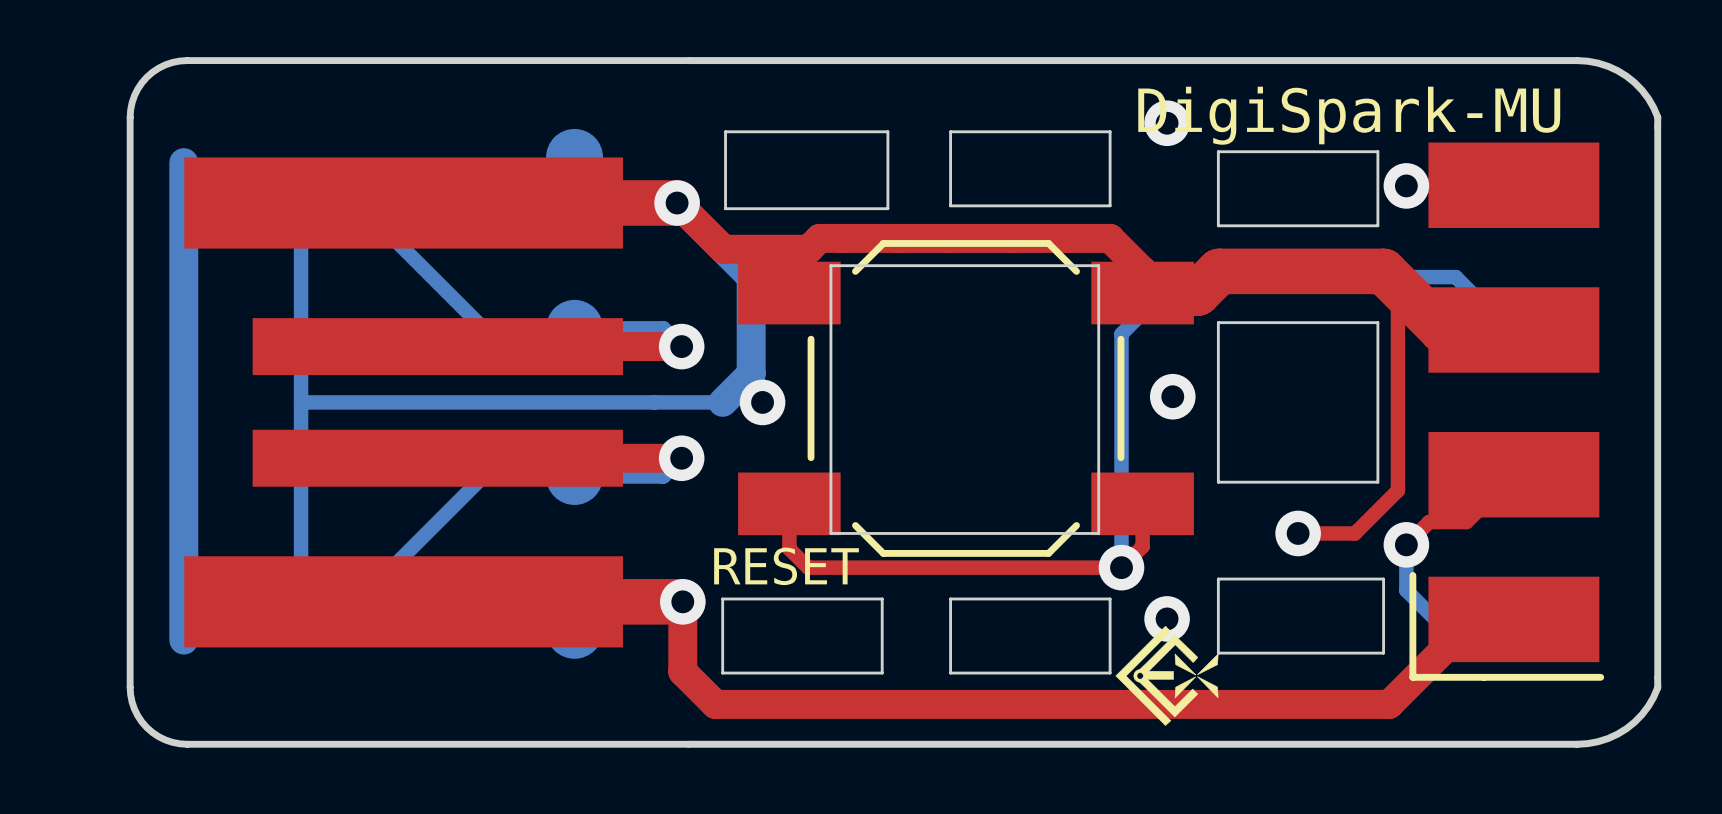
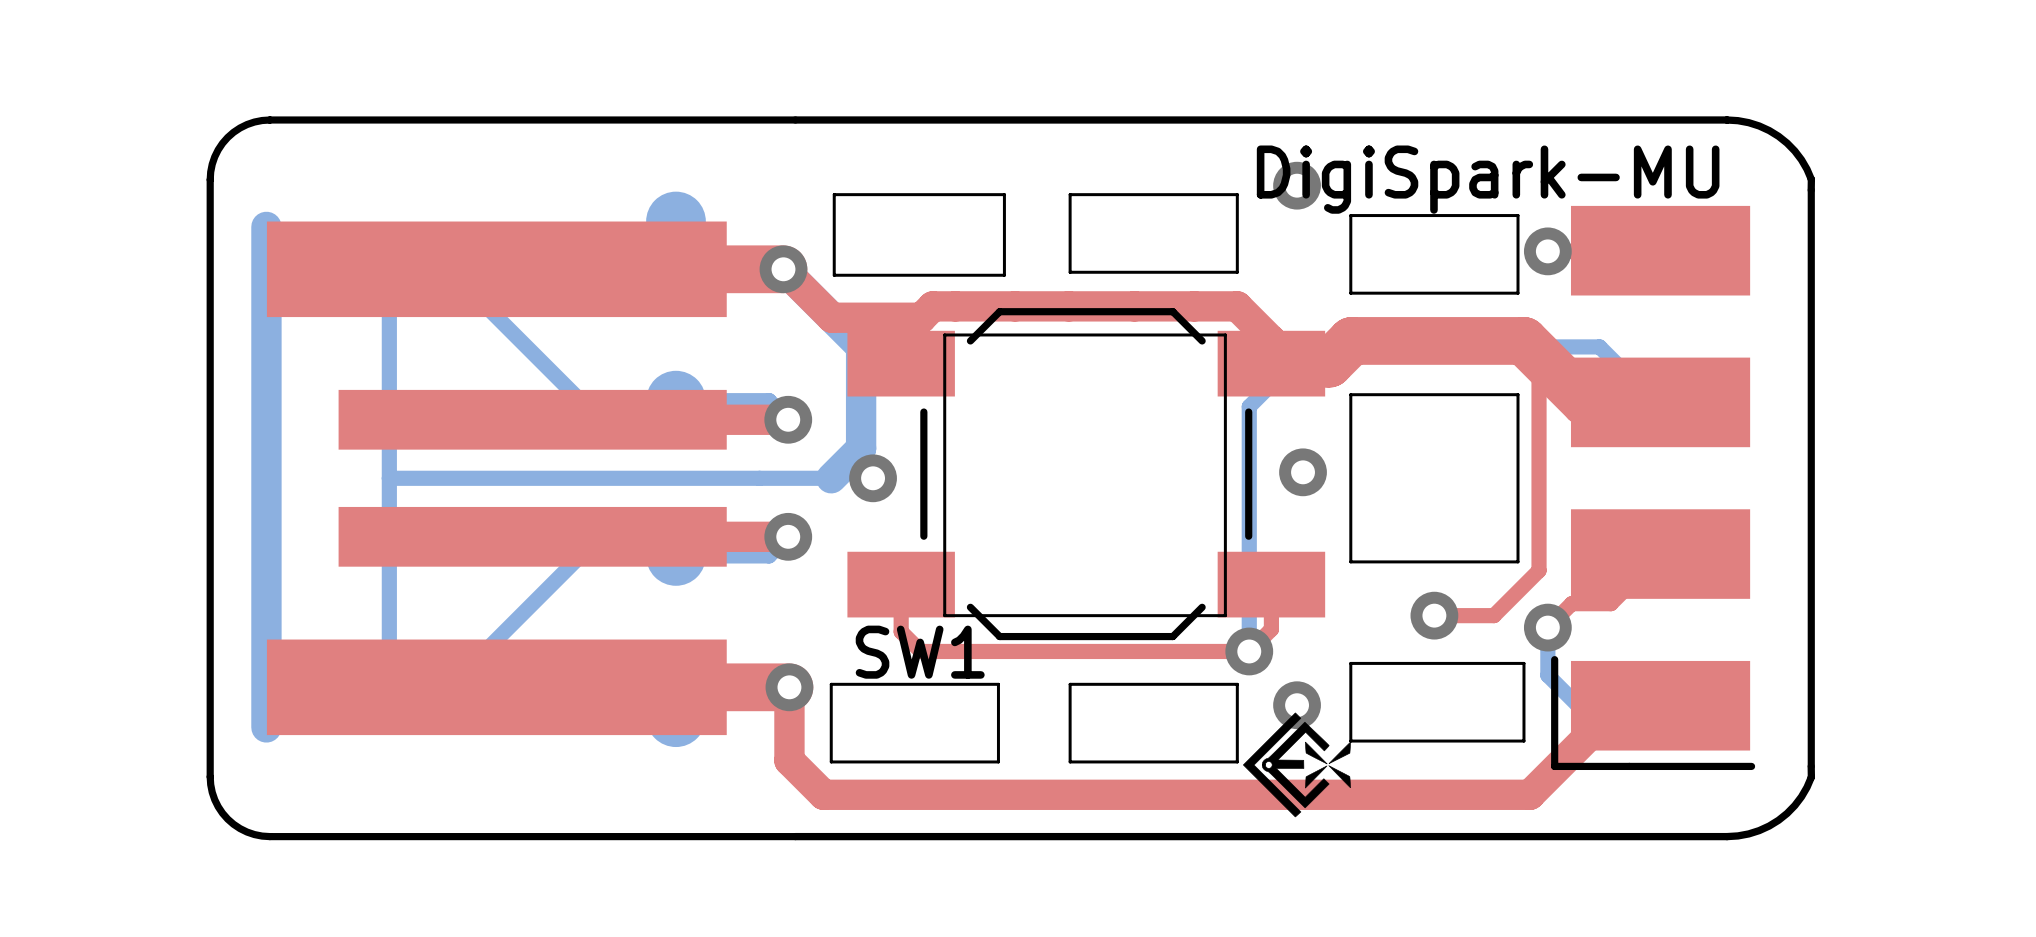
text: RESET (786, 566) -> none
SW1 name: none -> SW1 (920, 652)

